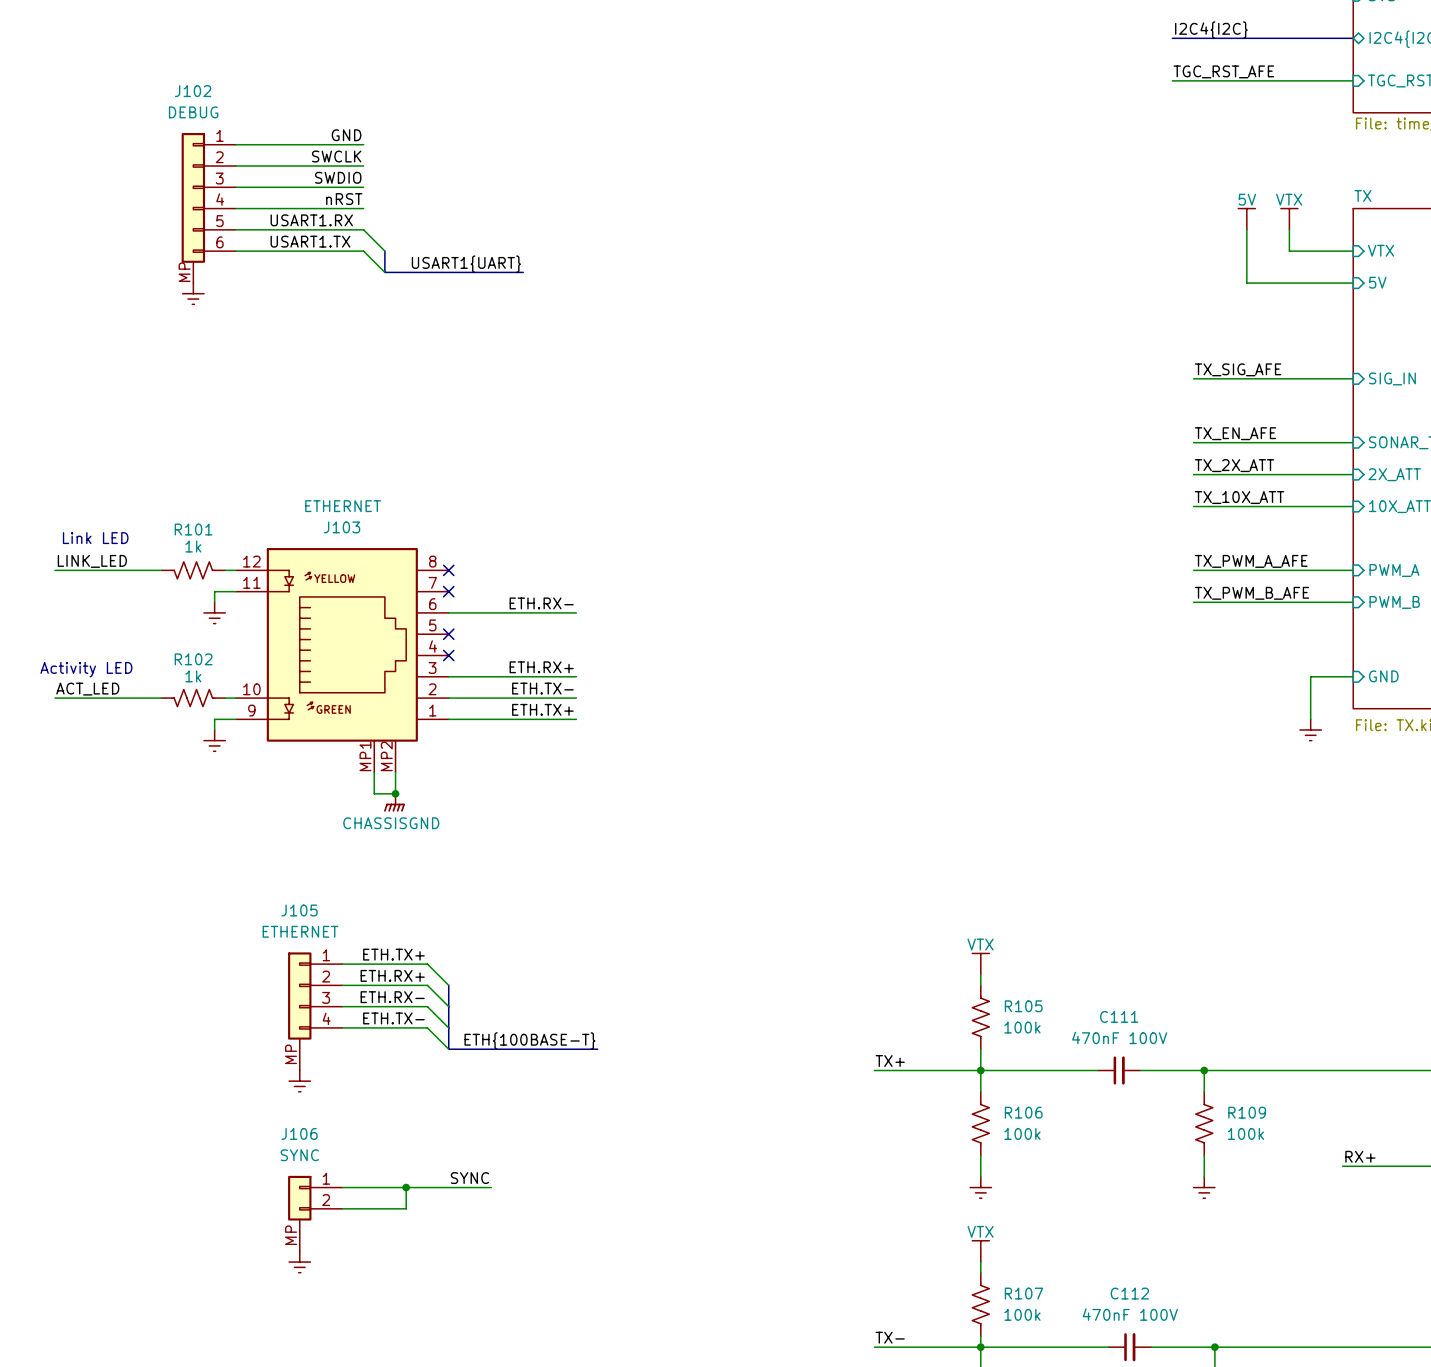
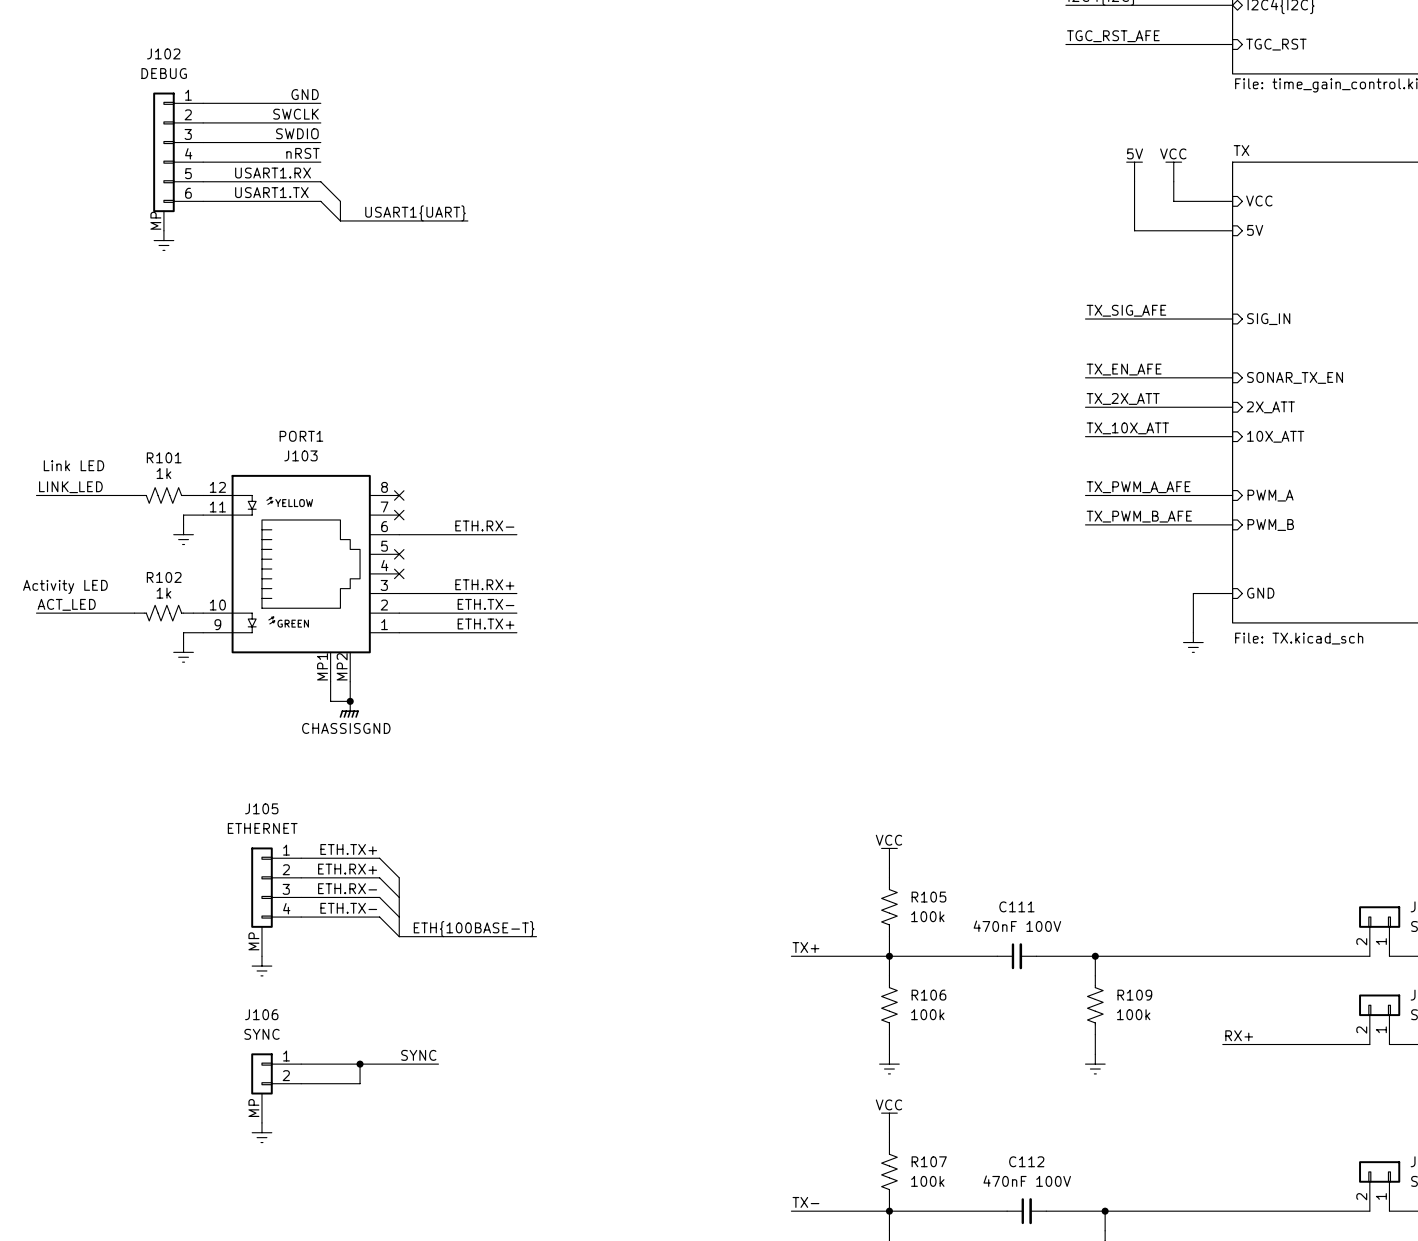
power symbol: VTX (1289, 219) -> VCC (1173, 171)
sheet pin: VTX (1381, 250) -> VCC (1259, 200)
J103 value: ETHERNET (343, 506) -> PORT1 (301, 436)
power symbol: VTX (980, 964) -> VCC (889, 858)
power symbol: VTX (980, 1251) -> VCC (889, 1122)

